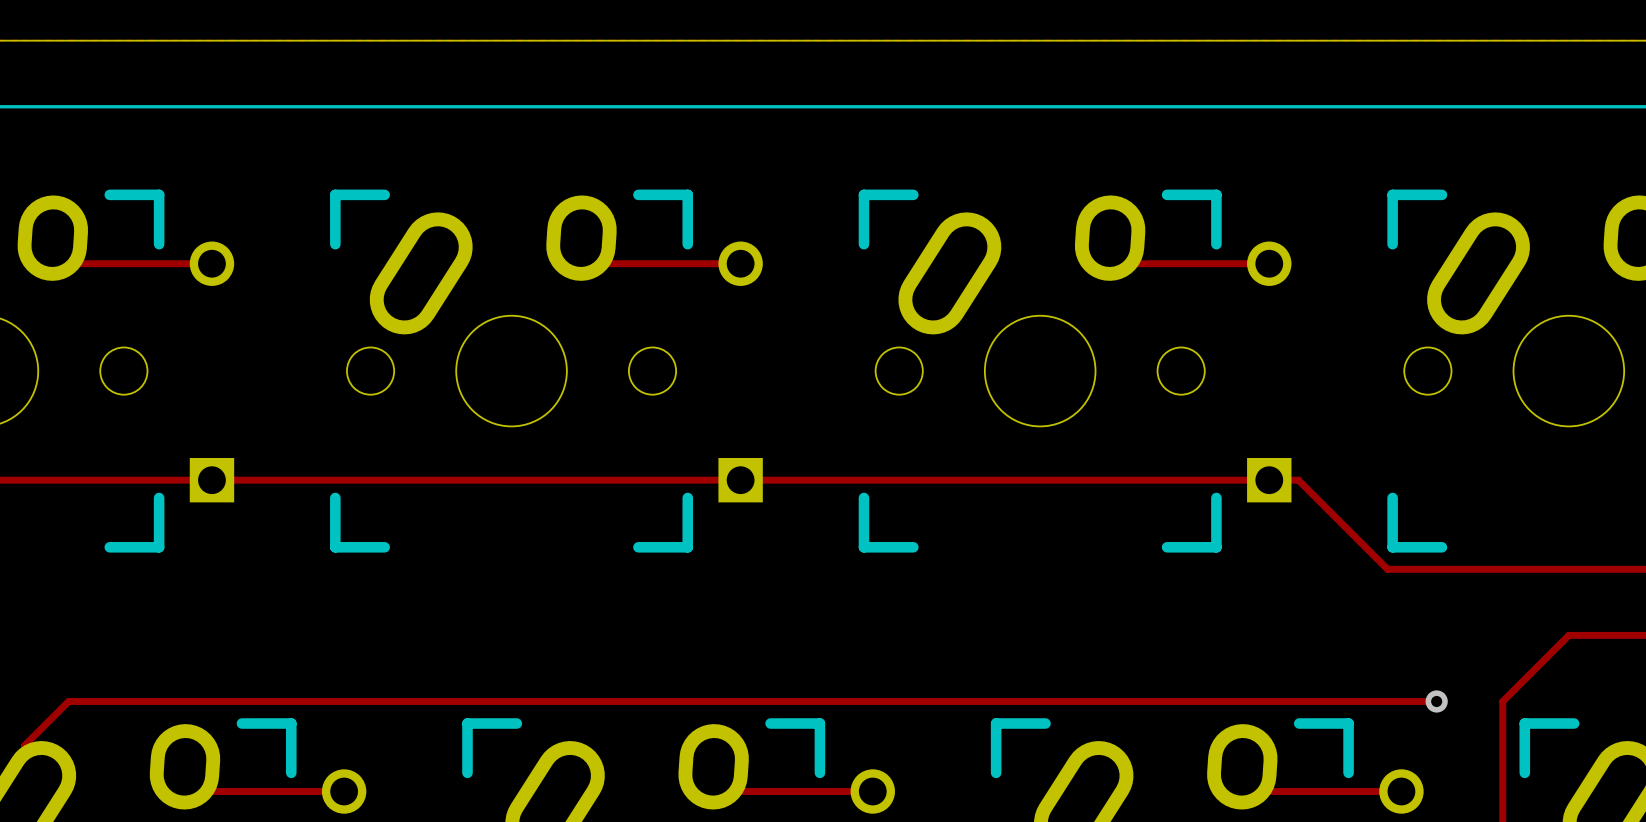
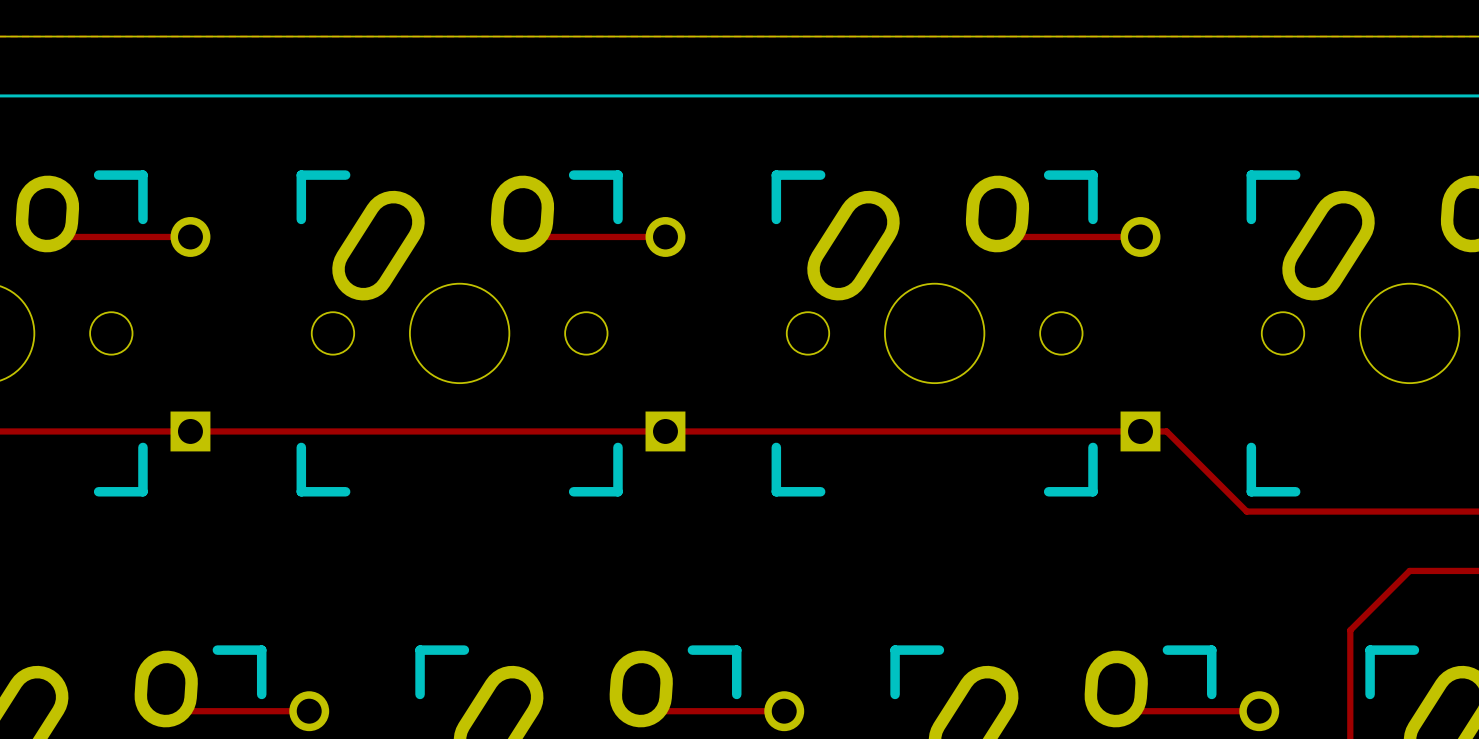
track: (1436, 701) (68, 701) (24, 745) (24, 802) -> none
via: (1436, 701) -> none

